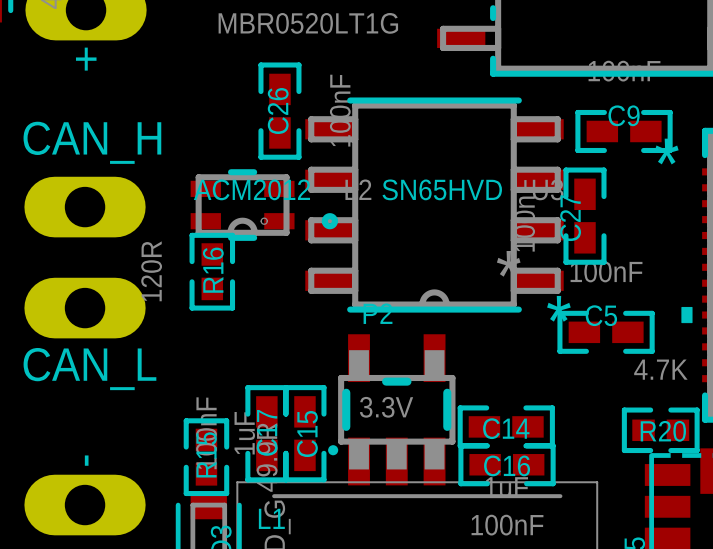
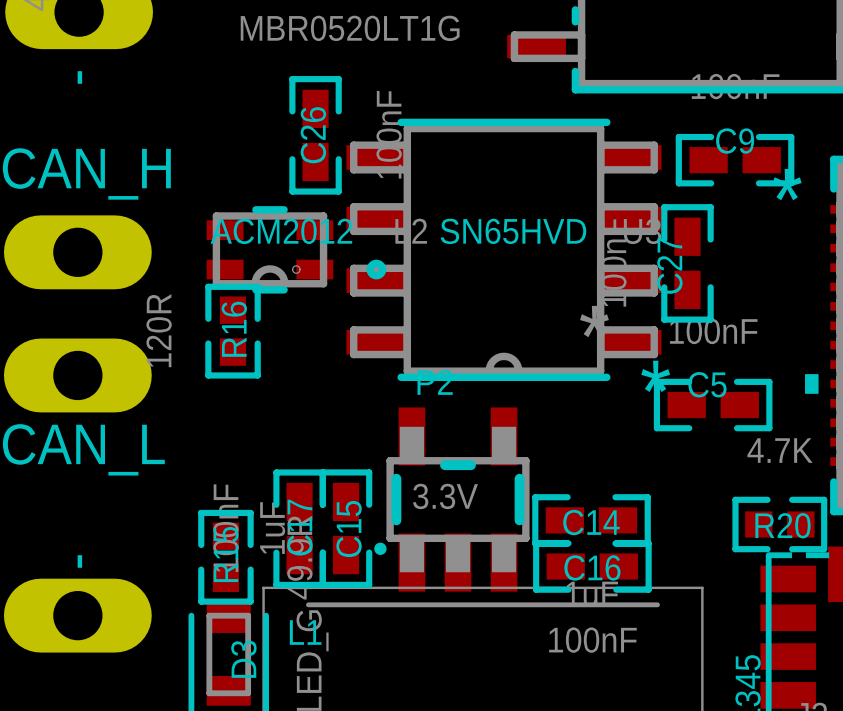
text: + (86, 59) -> - (79, 77)

